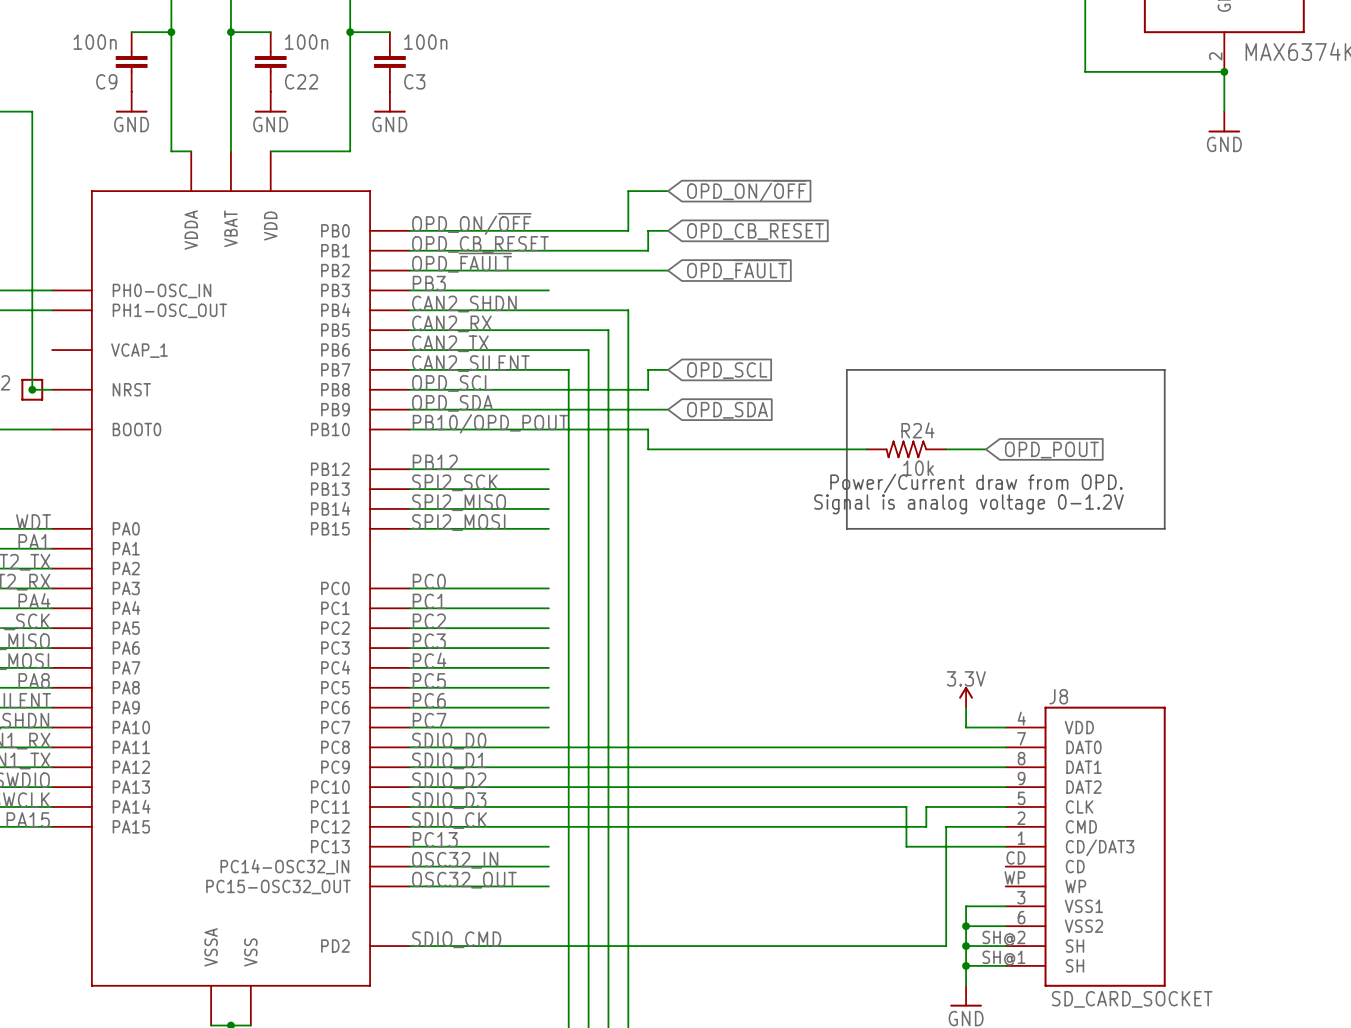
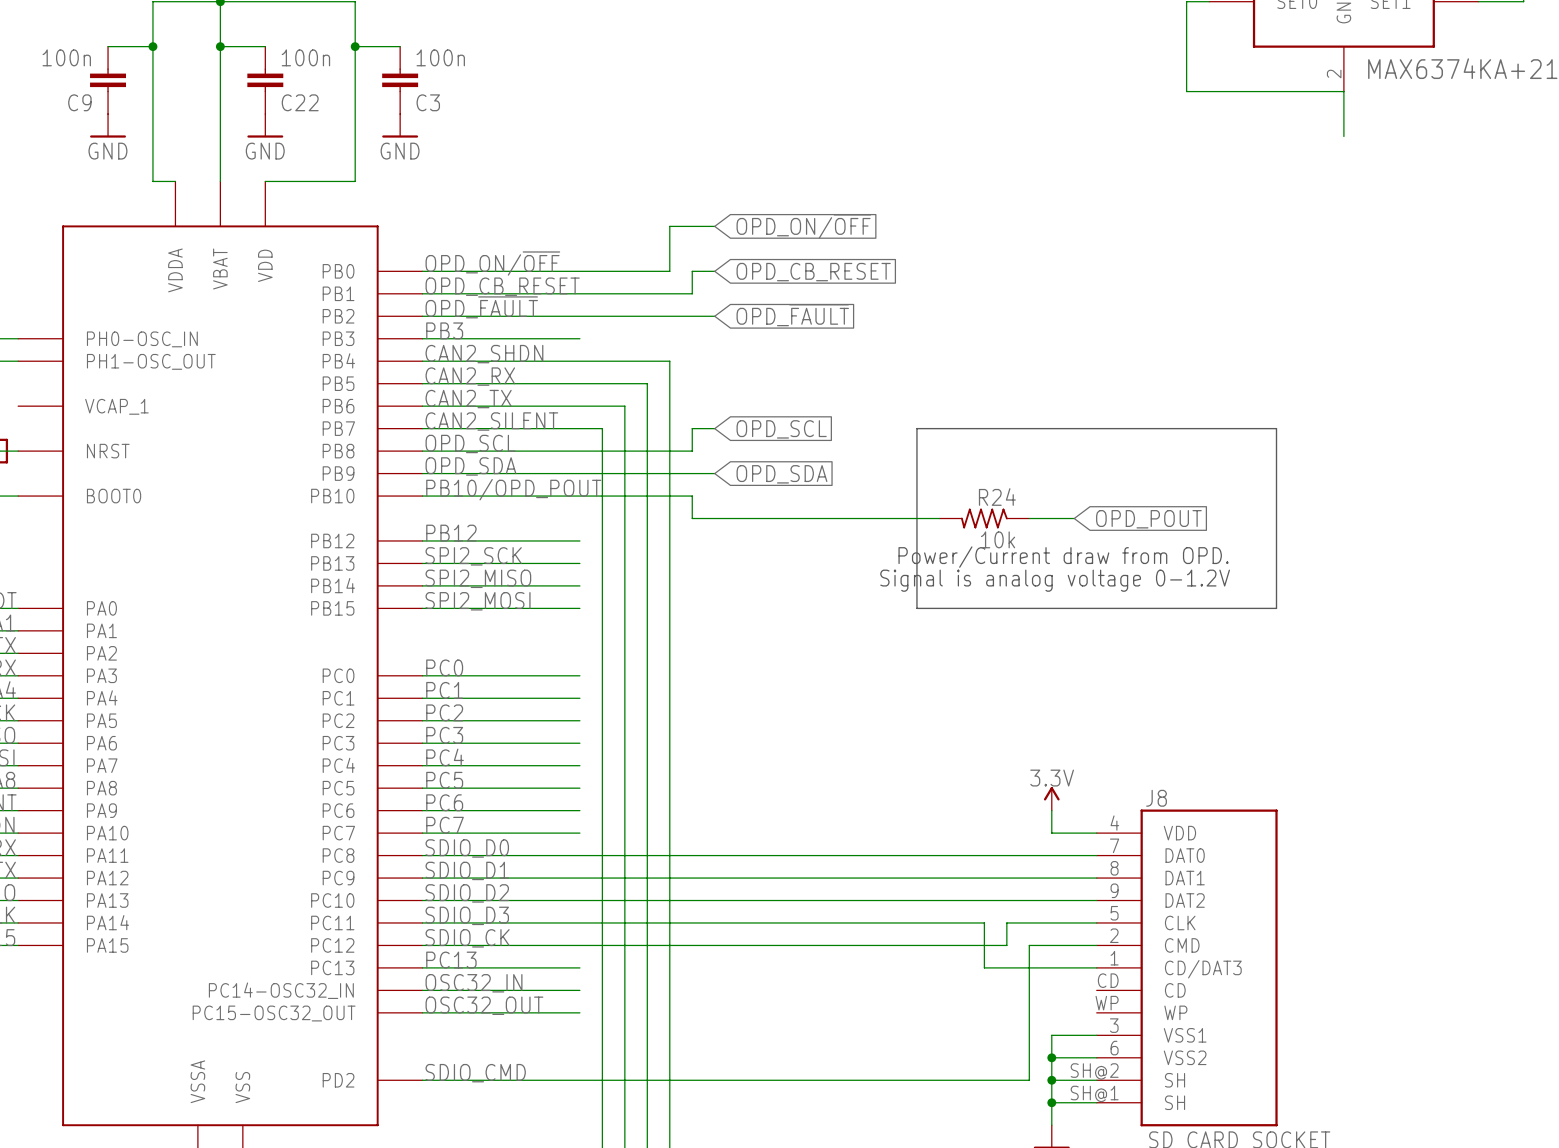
junction: (1224, 71) -> none
power symbol: GND (1224, 122) -> none

